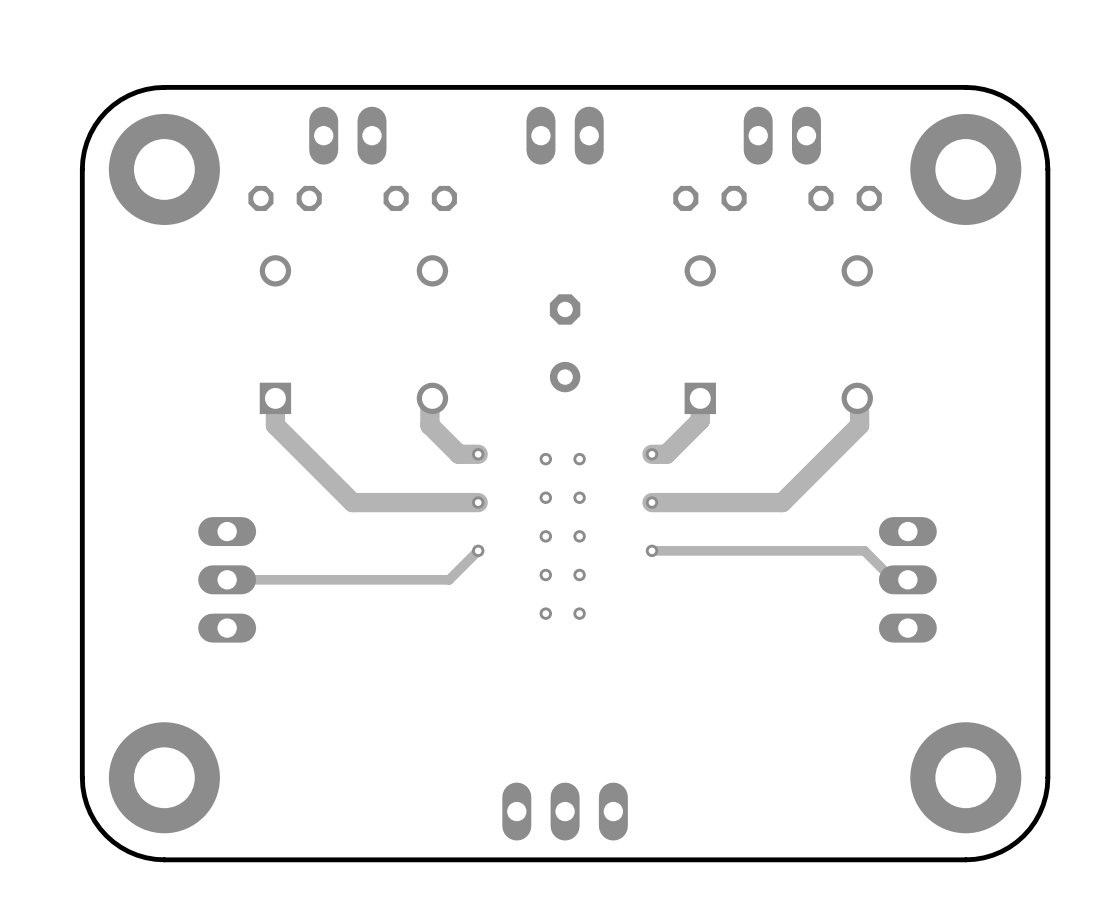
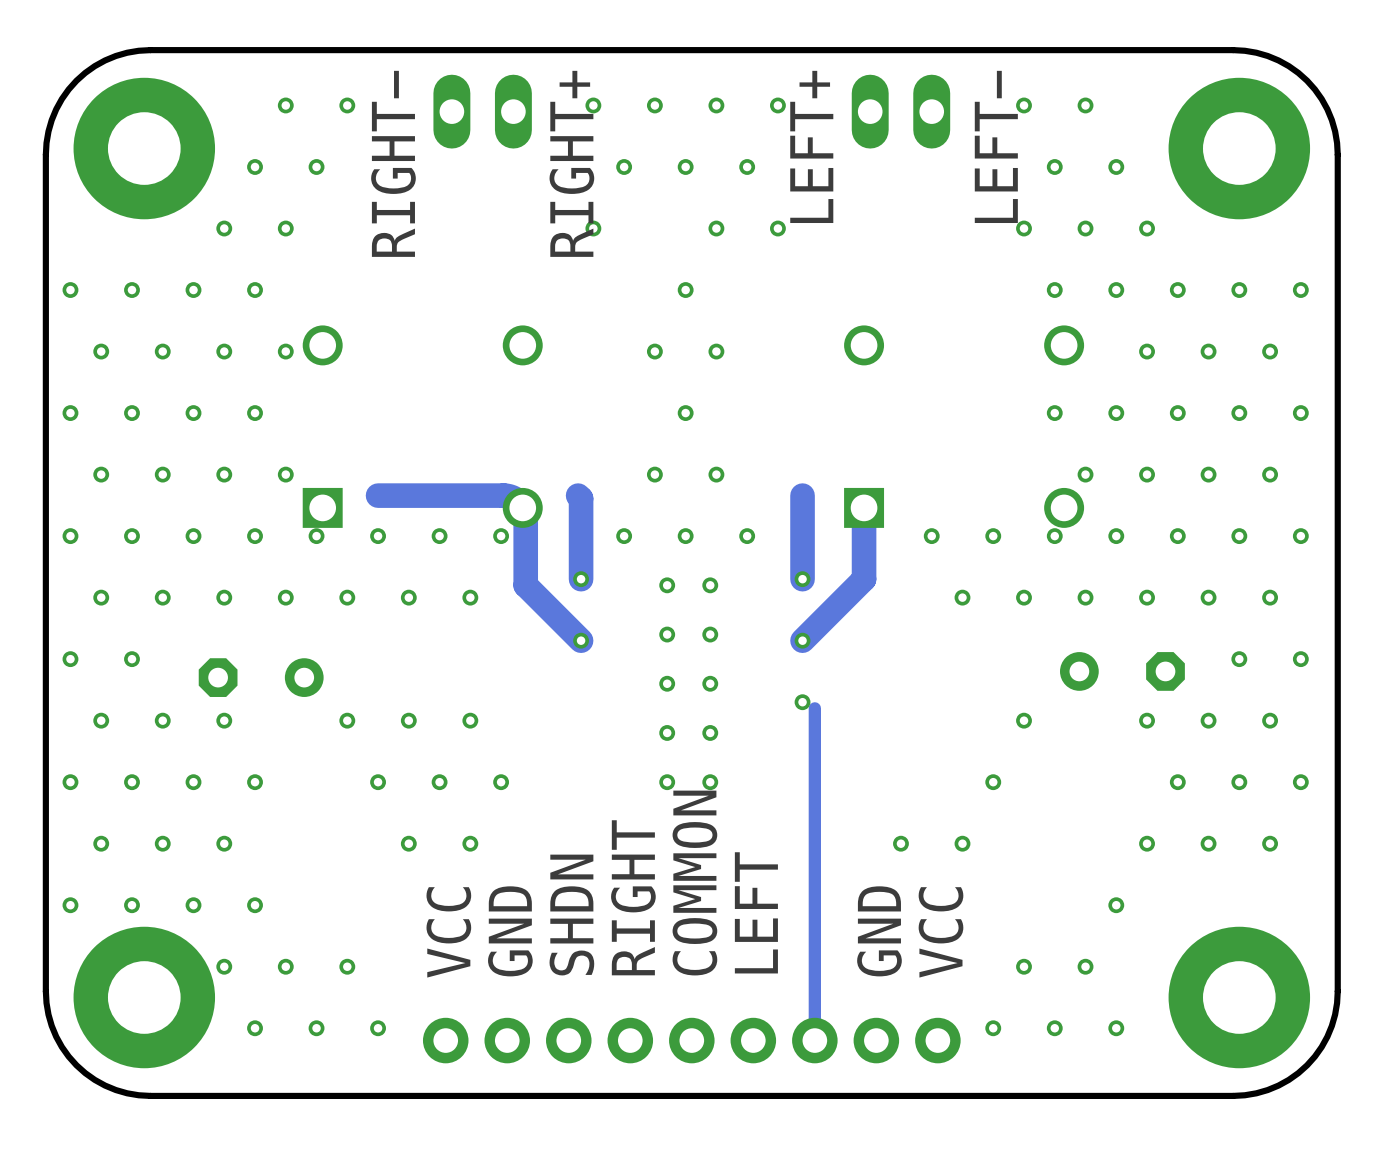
via: none -> (285, 105)
via: none -> (347, 105)
via: none -> (593, 105)
via: none -> (654, 105)
via: none -> (716, 105)
via: none -> (777, 105)
via: none -> (1024, 105)
via: none -> (1085, 105)
part: none -> (144, 148)
part: none -> (1239, 148)
text: none -> LEFT+ (811, 146)
text: none -> LEFT− (996, 146)
via: none -> (255, 166)
via: none -> (316, 166)
via: none -> (624, 166)
via: none -> (685, 166)
via: none -> (747, 166)
via: none -> (1054, 166)
via: none -> (1116, 166)
part position: (347, 135) -> (482, 111)
part: (565, 135) -> none
part position: (782, 135) -> (900, 111)
text: none -> RIGHT− (393, 163)
text: none -> RIGHT+ (571, 163)
part: (164, 169) -> none
part: (965, 169) -> none
via: none -> (224, 228)
via: none -> (285, 228)
via: none -> (593, 228)
via: none -> (716, 228)
via: none -> (777, 228)
via: none -> (1024, 228)
via: none -> (1085, 228)
via: none -> (1147, 228)
part: (285, 198) -> none
part: (420, 198) -> none
part: (709, 198) -> none
part: (845, 198) -> none
via: none -> (70, 290)
via: none -> (131, 290)
via: none -> (193, 290)
via: none -> (255, 290)
via: none -> (685, 290)
via: none -> (1054, 290)
via: none -> (1116, 290)
via: none -> (1177, 290)
via: none -> (1239, 290)
via: none -> (1300, 290)
via: none -> (101, 351)
via: none -> (162, 351)
via: none -> (224, 351)
via: none -> (285, 351)
via: none -> (654, 351)
via: none -> (716, 351)
via: none -> (1147, 351)
via: none -> (1208, 351)
via: none -> (1270, 351)
via: none -> (70, 413)
via: none -> (131, 413)
via: none -> (193, 413)
via: none -> (255, 413)
via: none -> (685, 413)
via: none -> (1054, 413)
via: none -> (1116, 413)
via: none -> (1177, 413)
via: none -> (1239, 413)
via: none -> (1300, 413)
part: (565, 343) -> none
via: none -> (101, 474)
via: none -> (162, 474)
via: none -> (224, 474)
via: none -> (285, 474)
via: none -> (654, 474)
via: none -> (716, 474)
via: none -> (1085, 474)
via: none -> (1147, 474)
via: none -> (1208, 474)
via: none -> (1270, 474)
track: none -> (802, 495) (802, 579)
track: (275, 398) (275, 425) (352, 502) (478, 502) -> (378, 495) (503, 495) (517, 500) (522, 506) (525, 514) (525, 585) (581, 640)
track: (432, 398) (429, 400) (429, 425) (458, 454) (478, 454) -> (578, 495) (581, 498) (581, 579)
track: (857, 398) (859, 400) (859, 425) (782, 502) (651, 502) -> none
via: none -> (70, 536)
via: none -> (131, 536)
via: none -> (193, 536)
via: none -> (255, 536)
via: none -> (316, 536)
via: none -> (378, 536)
via: none -> (439, 536)
via: none -> (501, 536)
via: none -> (624, 536)
via: none -> (685, 536)
via: none -> (747, 536)
track: (700, 420) (666, 454) (651, 454) -> (864, 536) (864, 579) (802, 640)
via: none -> (931, 536)
via: none -> (993, 536)
via: none -> (1054, 536)
via: none -> (1116, 536)
via: none -> (1177, 536)
via: none -> (1239, 536)
via: none -> (1300, 536)
via: none -> (101, 597)
via: none -> (162, 597)
via: none -> (224, 597)
via: none -> (285, 597)
via: none -> (347, 597)
via: none -> (408, 597)
via: none -> (470, 597)
via: none -> (962, 597)
via: none -> (1024, 597)
via: none -> (1085, 597)
via: none -> (1147, 597)
via: none -> (1208, 597)
via: none -> (1270, 597)
via: none -> (70, 659)
via: none -> (131, 659)
via: none -> (1239, 659)
via: none -> (1300, 659)
part: none -> (1122, 671)
part: none -> (261, 677)
track: (478, 550) (449, 579) (227, 579) -> none
via: (478, 550) -> none
track: (651, 550) (864, 550) (893, 579) (907, 579) -> none
track: none -> (814, 708) (814, 1040)
via: none -> (101, 720)
via: none -> (162, 720)
via: none -> (224, 720)
via: none -> (347, 720)
via: none -> (408, 720)
via: none -> (470, 720)
via: none -> (1024, 720)
via: none -> (1147, 720)
via: none -> (1208, 720)
via: none -> (1270, 720)
part: (227, 579) -> none
part: (907, 579) -> none
via: none -> (70, 782)
via: none -> (131, 782)
via: none -> (193, 782)
via: none -> (255, 782)
via: none -> (378, 782)
via: none -> (439, 782)
via: none -> (501, 782)
via: none -> (993, 782)
via: none -> (1177, 782)
via: none -> (1239, 782)
via: none -> (1300, 782)
via: none -> (101, 843)
via: none -> (162, 843)
via: none -> (224, 843)
via: none -> (408, 843)
via: none -> (470, 843)
via: none -> (900, 843)
via: none -> (962, 843)
via: none -> (1147, 843)
via: none -> (1208, 843)
via: none -> (1270, 843)
text: none -> COMMON (694, 883)
text: none -> RIGHT (633, 897)
text: none -> SHDN (571, 915)
via: none -> (70, 905)
via: none -> (131, 905)
via: none -> (193, 905)
via: none -> (255, 905)
via: none -> (1116, 905)
text: none -> LEFT (756, 912)
text: none -> GND (510, 931)
text: none -> GND (879, 931)
text: none -> VCC (448, 932)
text: none -> VCC (940, 932)
via: none -> (224, 966)
via: none -> (285, 966)
via: none -> (347, 966)
via: none -> (1024, 966)
via: none -> (1085, 966)
part: (164, 777) -> none
part: (965, 777) -> none
part: none -> (144, 997)
part footprint: [502, 782, 628, 841] -> [422, 1017, 961, 1064]
part: none -> (1239, 997)
via: none -> (255, 1028)
via: none -> (316, 1028)
via: none -> (378, 1028)
via: none -> (993, 1028)
via: none -> (1054, 1028)
via: none -> (1116, 1028)
board edge: (965, 859) (984, 857) (1001, 851) (1023, 835) (1039, 813) (1045, 796) (1047, 777) (1047, 160) (1039, 133) (1023, 111) (1001, 95) (984, 89) (965, 87) (164, 87) (146, 89) (128, 95) (106, 111) (90, 133) (84, 151) (82, 169) (82, 786) (90, 813) (106, 835) (128, 851) (146, 857) (164, 859) -> (1202, 1095) (1256, 1093) (1278, 1085) (1298, 1073) (1314, 1056) (1327, 1036) (1335, 1014) (1337, 991) (1337, 142) (1327, 109) (1307, 80) (1278, 60) (1256, 52) (1233, 50) (150, 50) (127, 52) (105, 60) (76, 80) (56, 109) (48, 131) (45, 154) (46, 1003) (51, 1025) (61, 1046) (76, 1065) (94, 1079) (127, 1093) (181, 1095)

